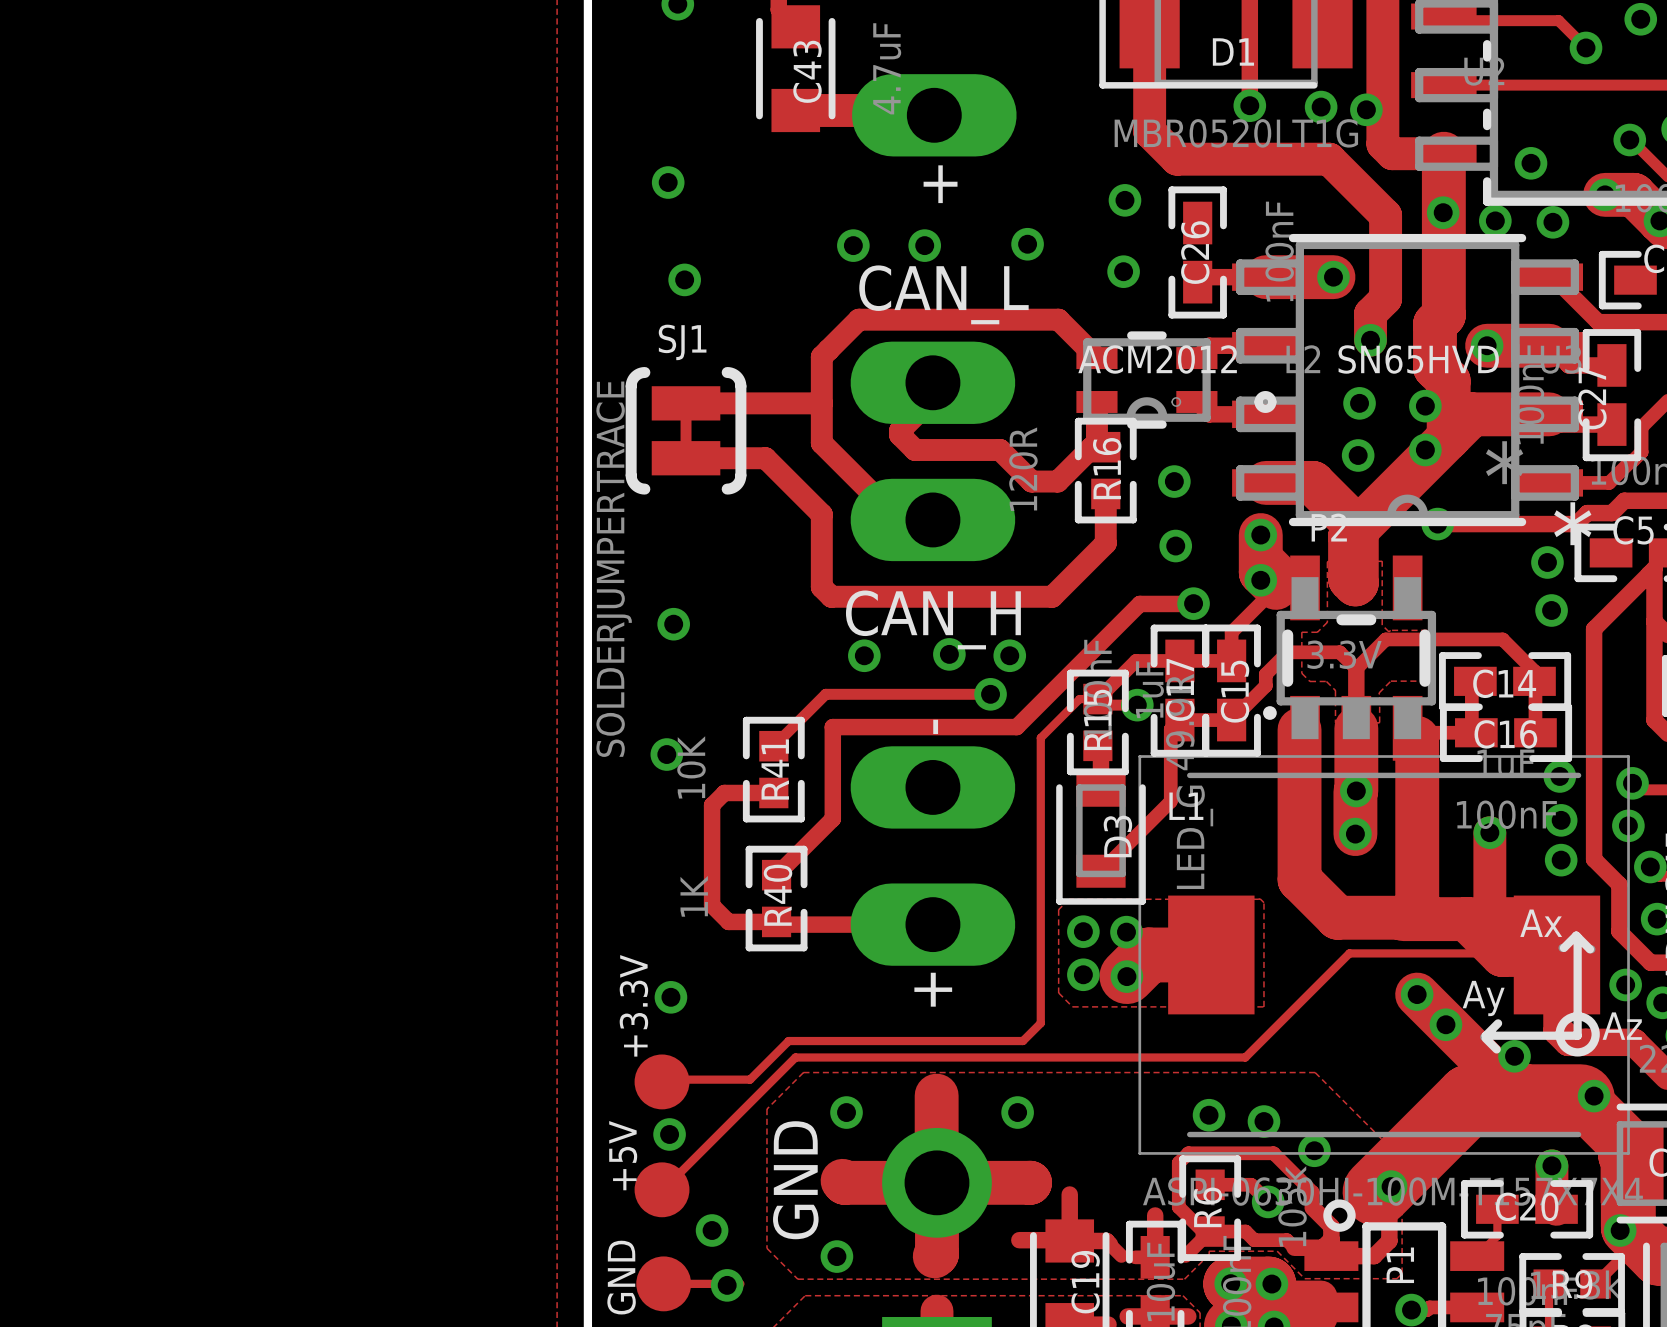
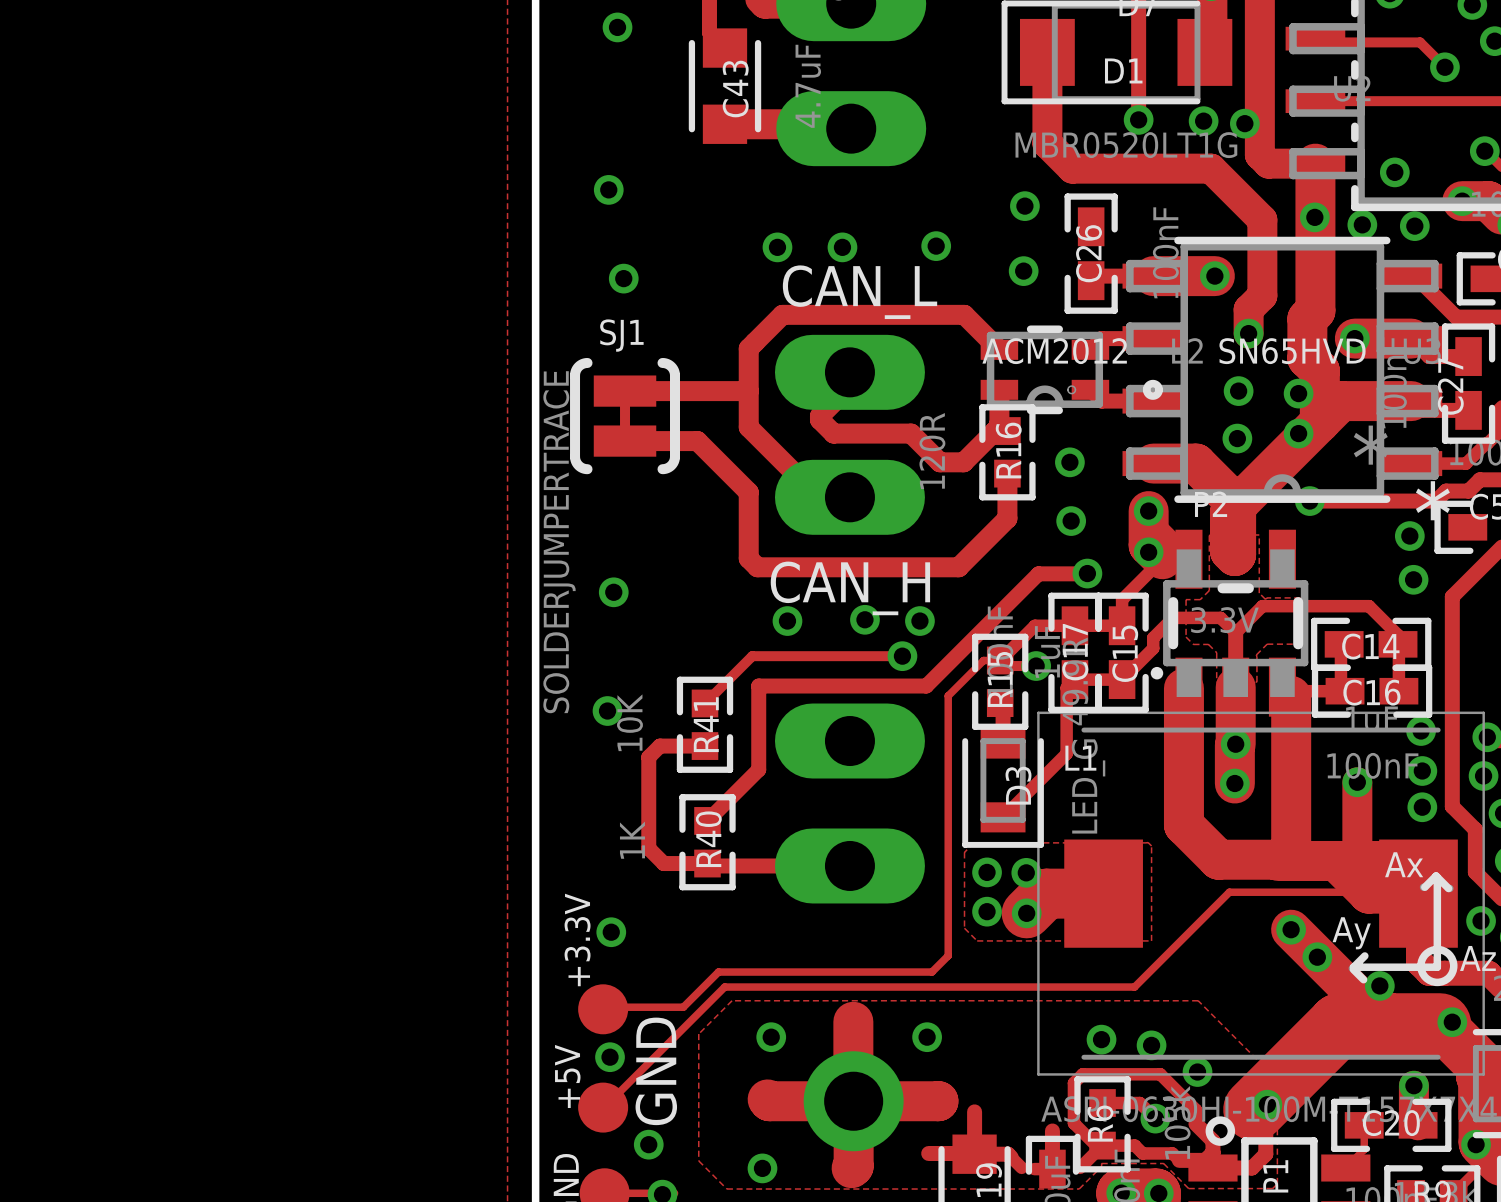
text: + (940, 184) -> none
text: - (935, 726) -> none
text: + (933, 989) -> none
text position: GND (795, 1180) -> GND (656, 1071)

